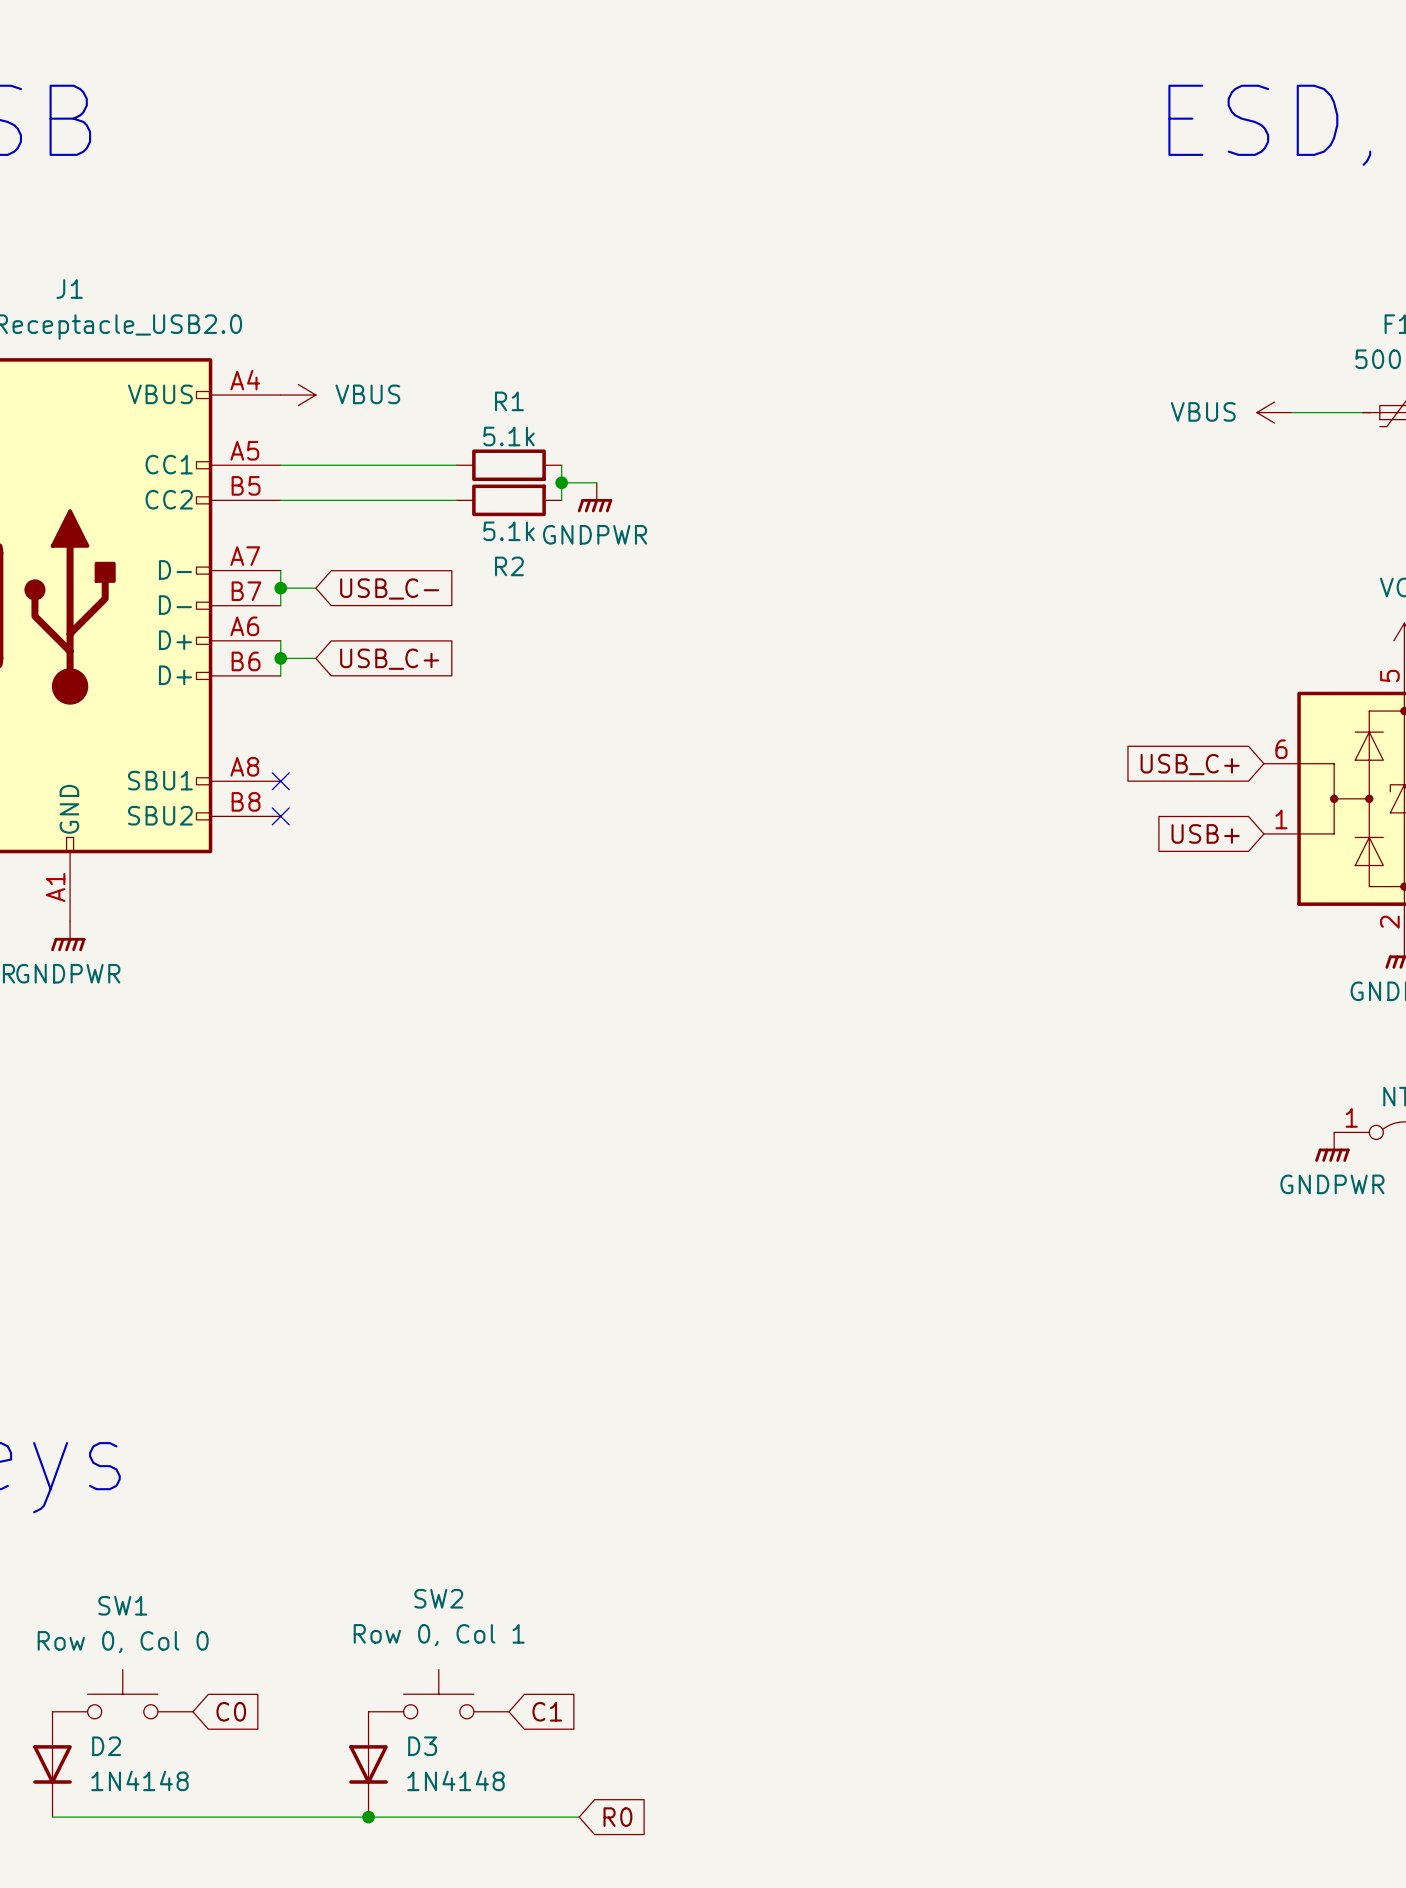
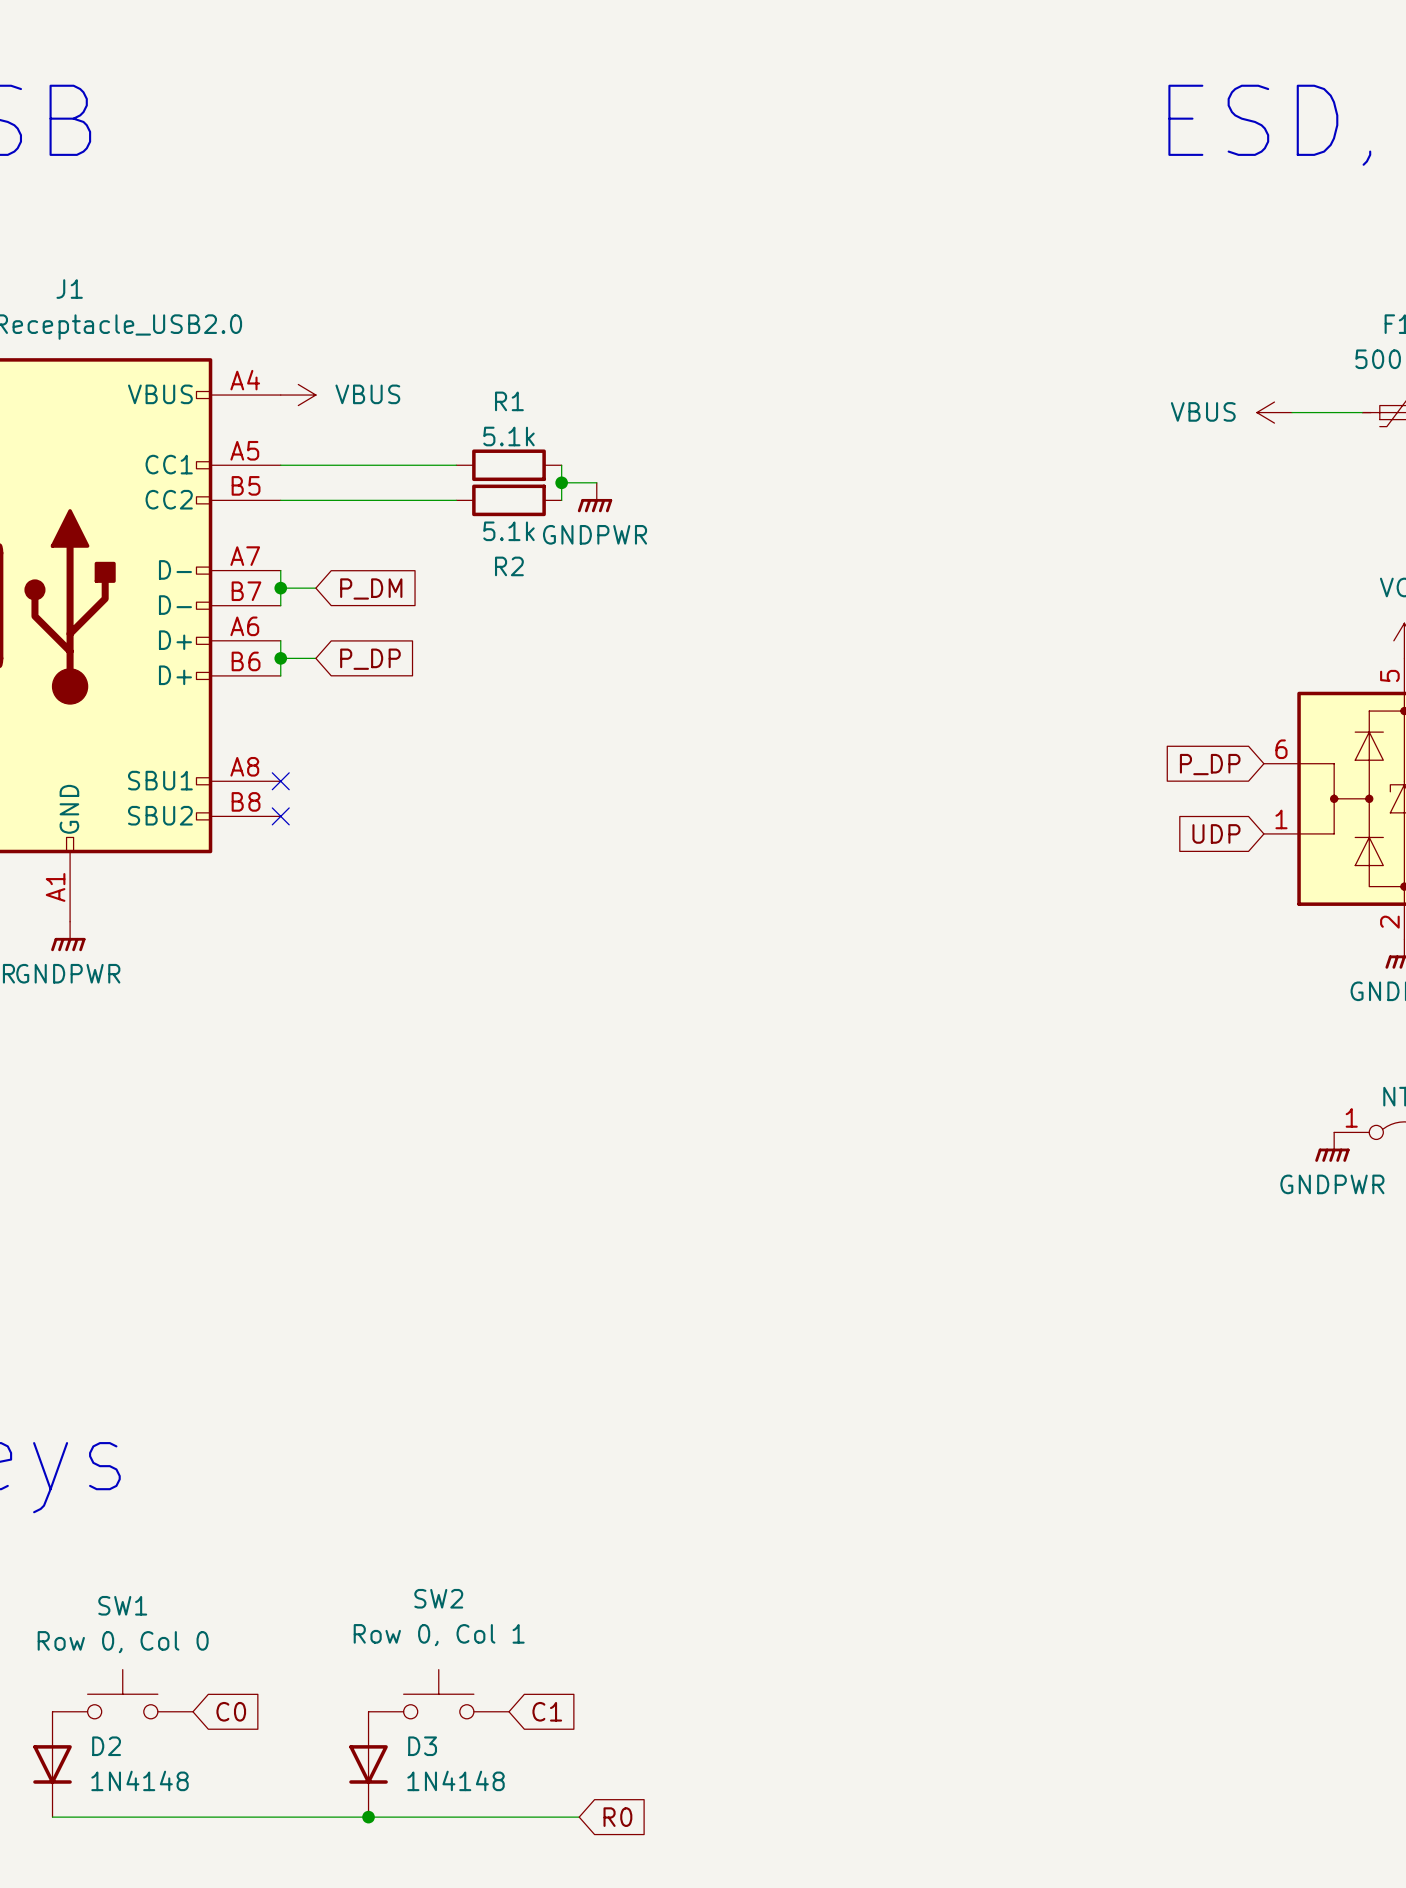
global label: USB_C- (389, 588) -> P_DM (371, 588)
global label: USB_C+ (389, 659) -> P_DP (370, 659)
global label: USB_C+ (1190, 764) -> P_DP (1210, 764)
global label: USB+ (1205, 833) -> UDP (1216, 833)

